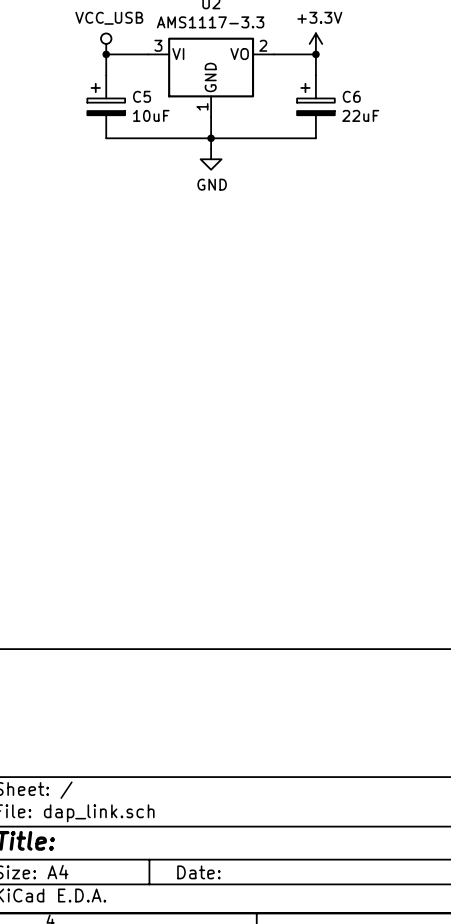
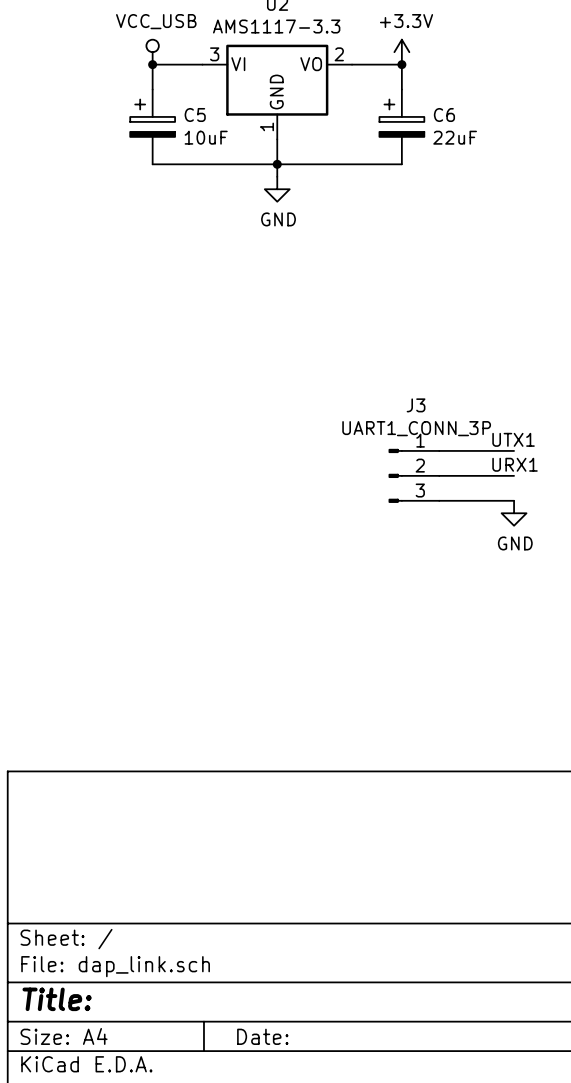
label: none -> UTX1 (513, 439)
wire: none -> (439, 450) (514, 450)
label: none -> URX1 (515, 464)
J3: none -> UART1_CONN_3P (413, 475)
wire: none -> (439, 475) (514, 475)
wire: none -> (439, 500) (514, 500)
power symbol: none -> GND (514, 513)

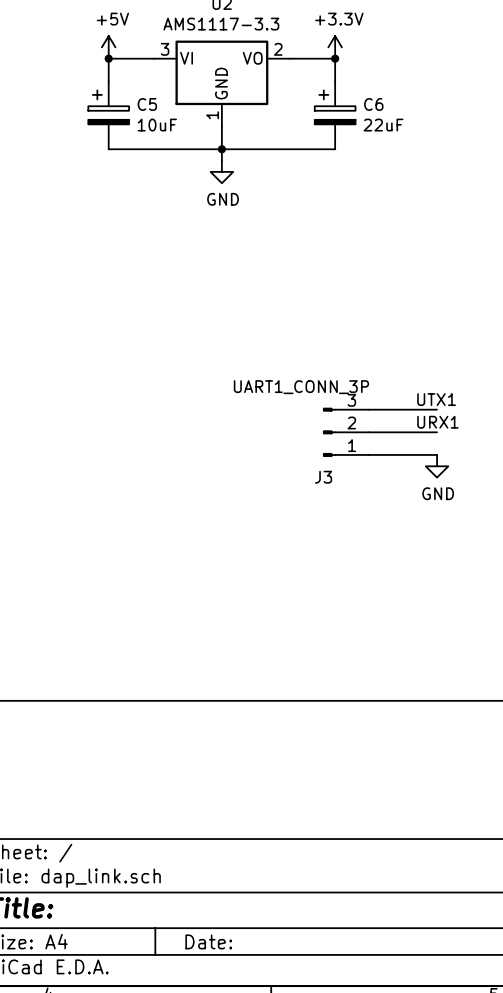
power symbol: VCC_USB (152, 52) -> +5V (108, 47)
J3 name position: J3 (416, 405) -> J3 (323, 477)
J3 value position: UART1_CONN_3P (416, 428) -> UART1_CONN_3P (301, 387)
J3 flip: as is (395, 475) -> up-down (329, 432)

